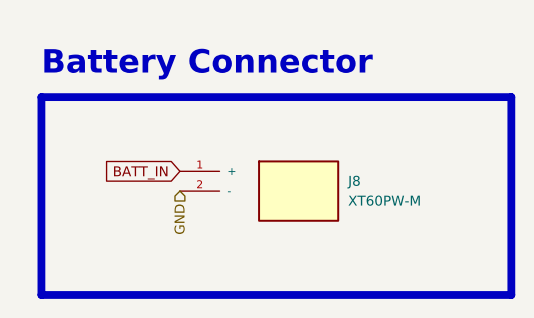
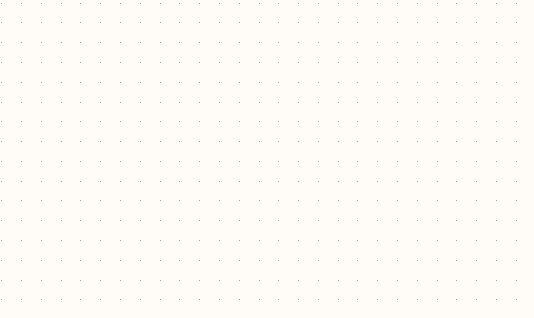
text: Battery Connector (208, 64) -> none
line: (41, 97) (511, 97) (511, 294) (41, 294) (41, 97) -> none
global label: BATT_IN (140, 172) -> none
J8: XT60PW-M (259, 191) -> none
hierarchical label: GND (179, 219) -> none

